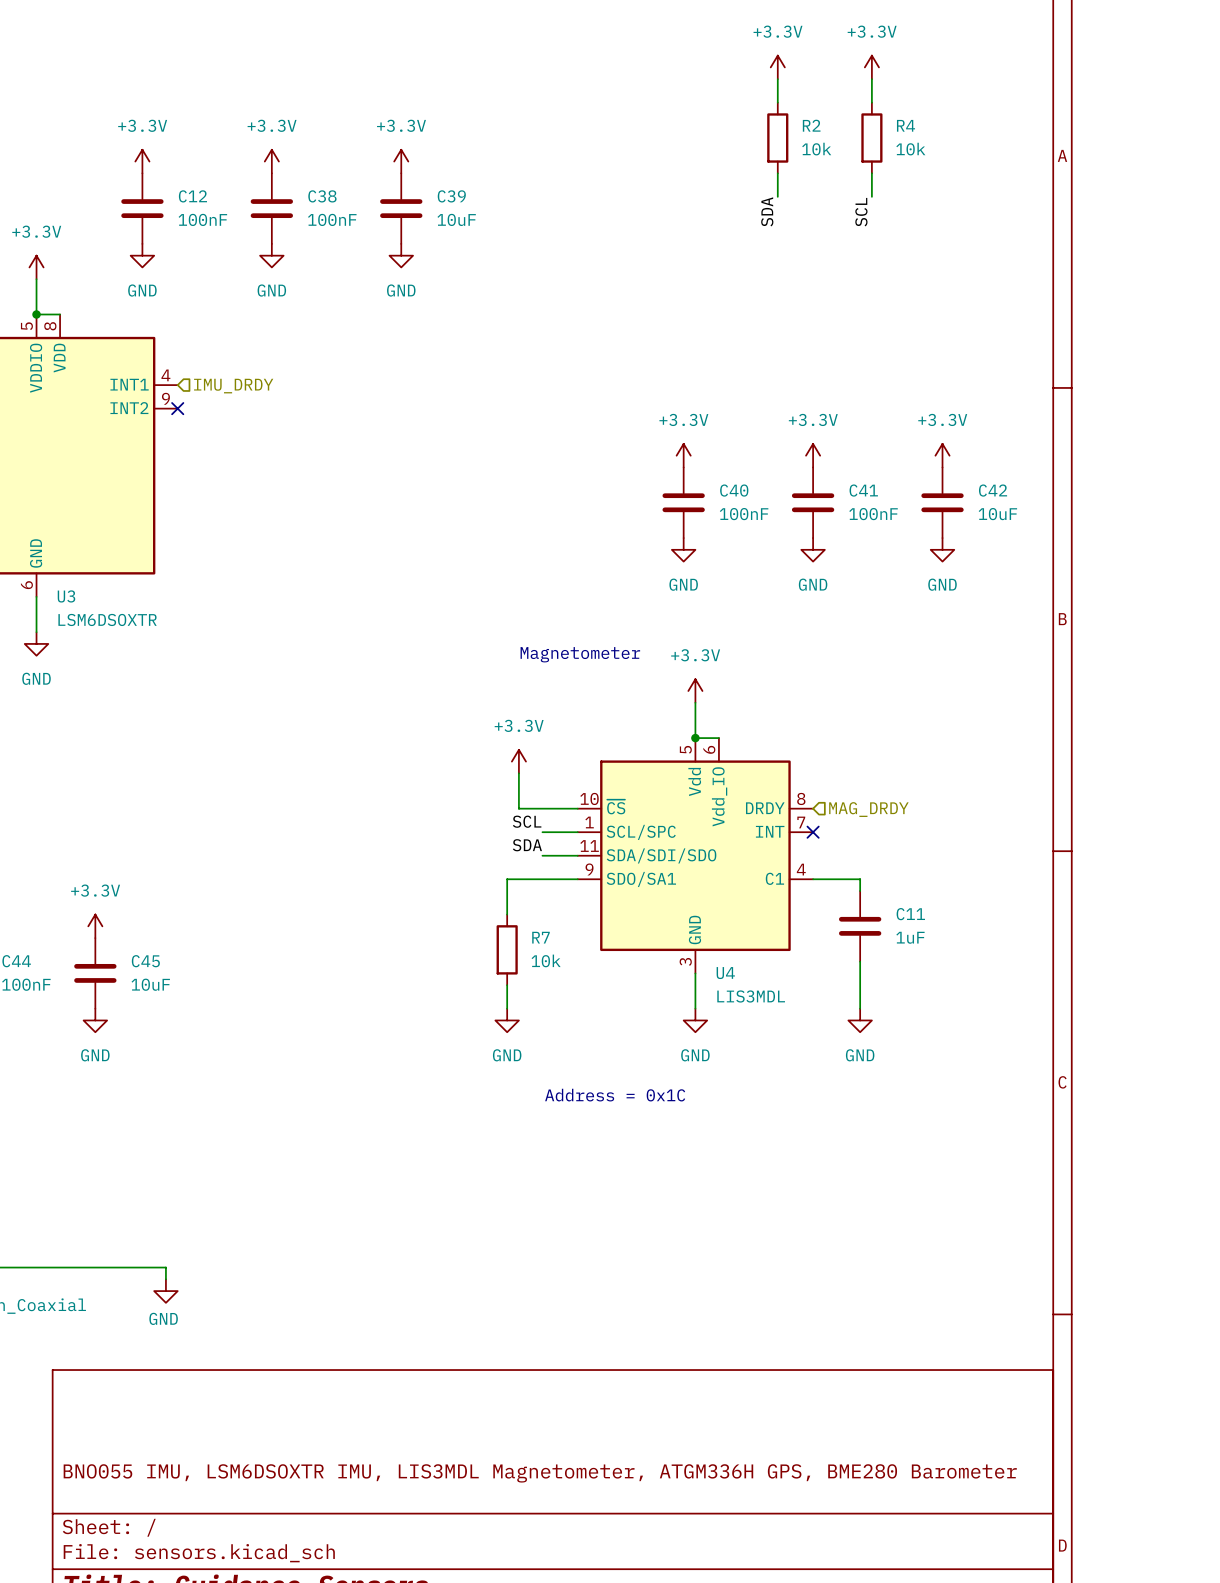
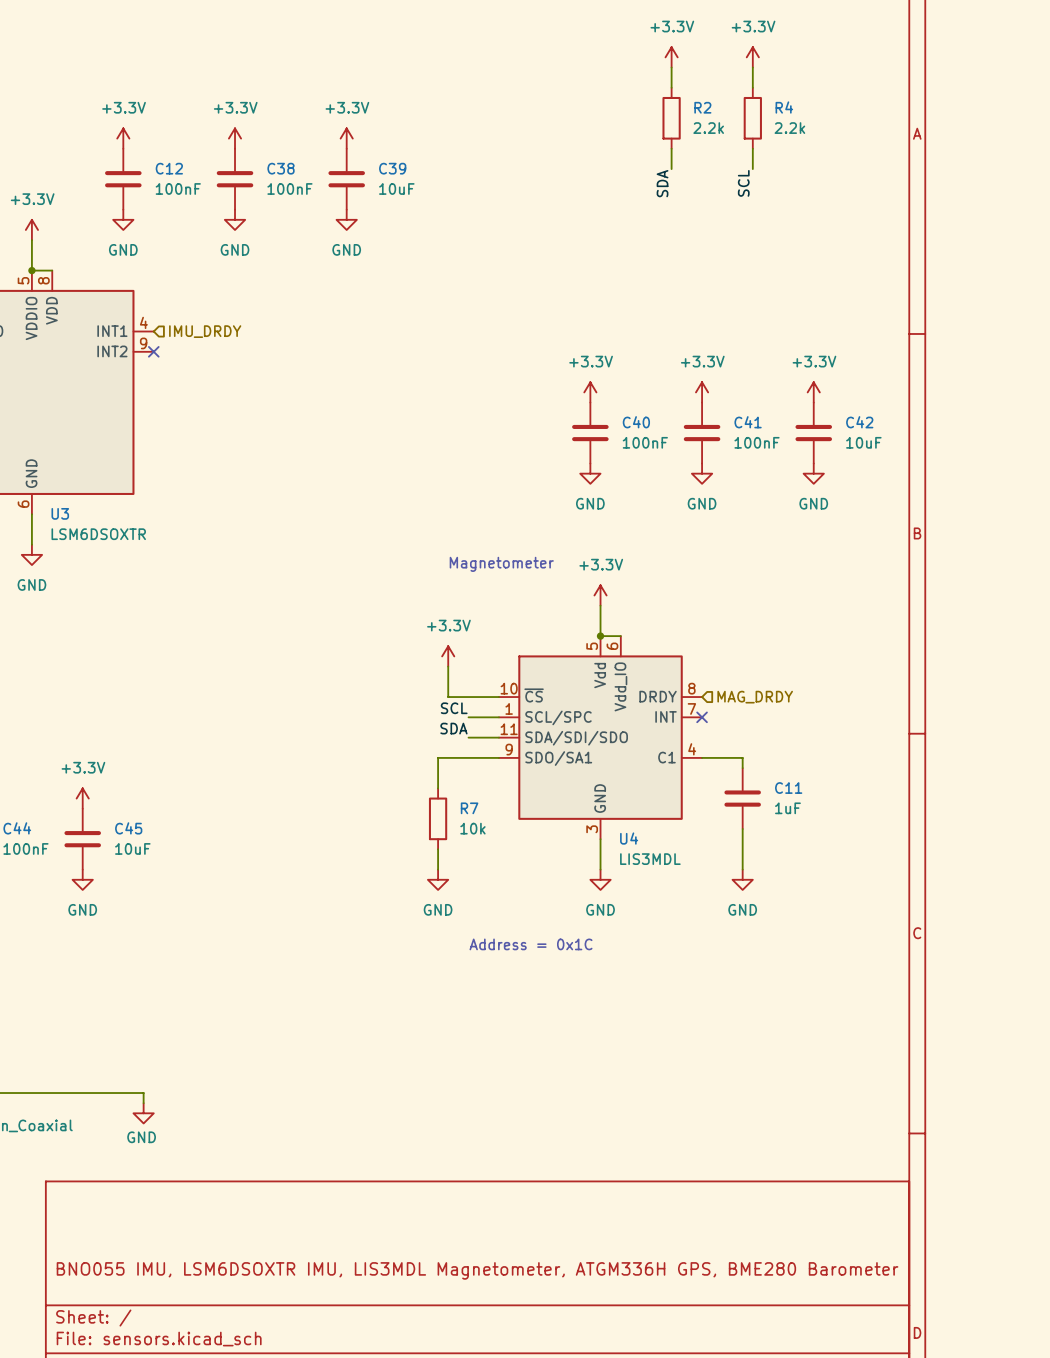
R2 value: 10k (816, 149) -> 2.2k (708, 128)
R4 value: 10k (910, 149) -> 2.2k (789, 128)

